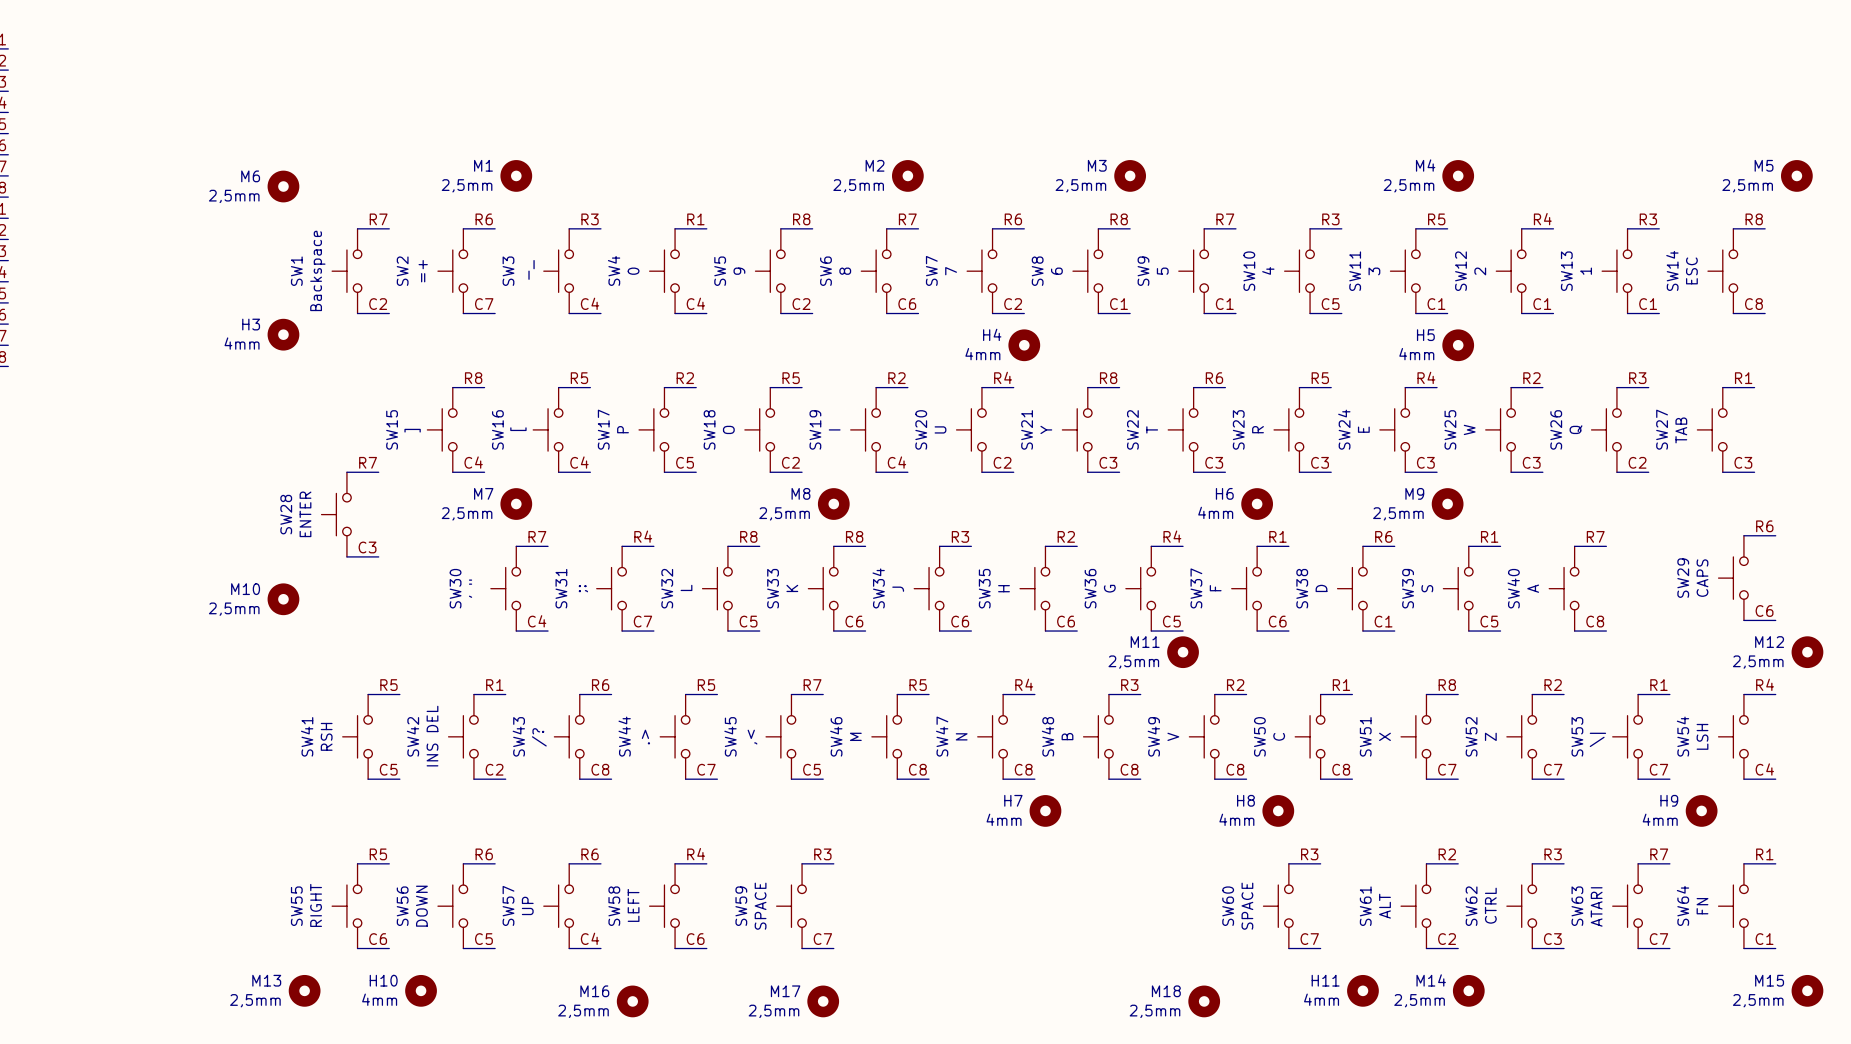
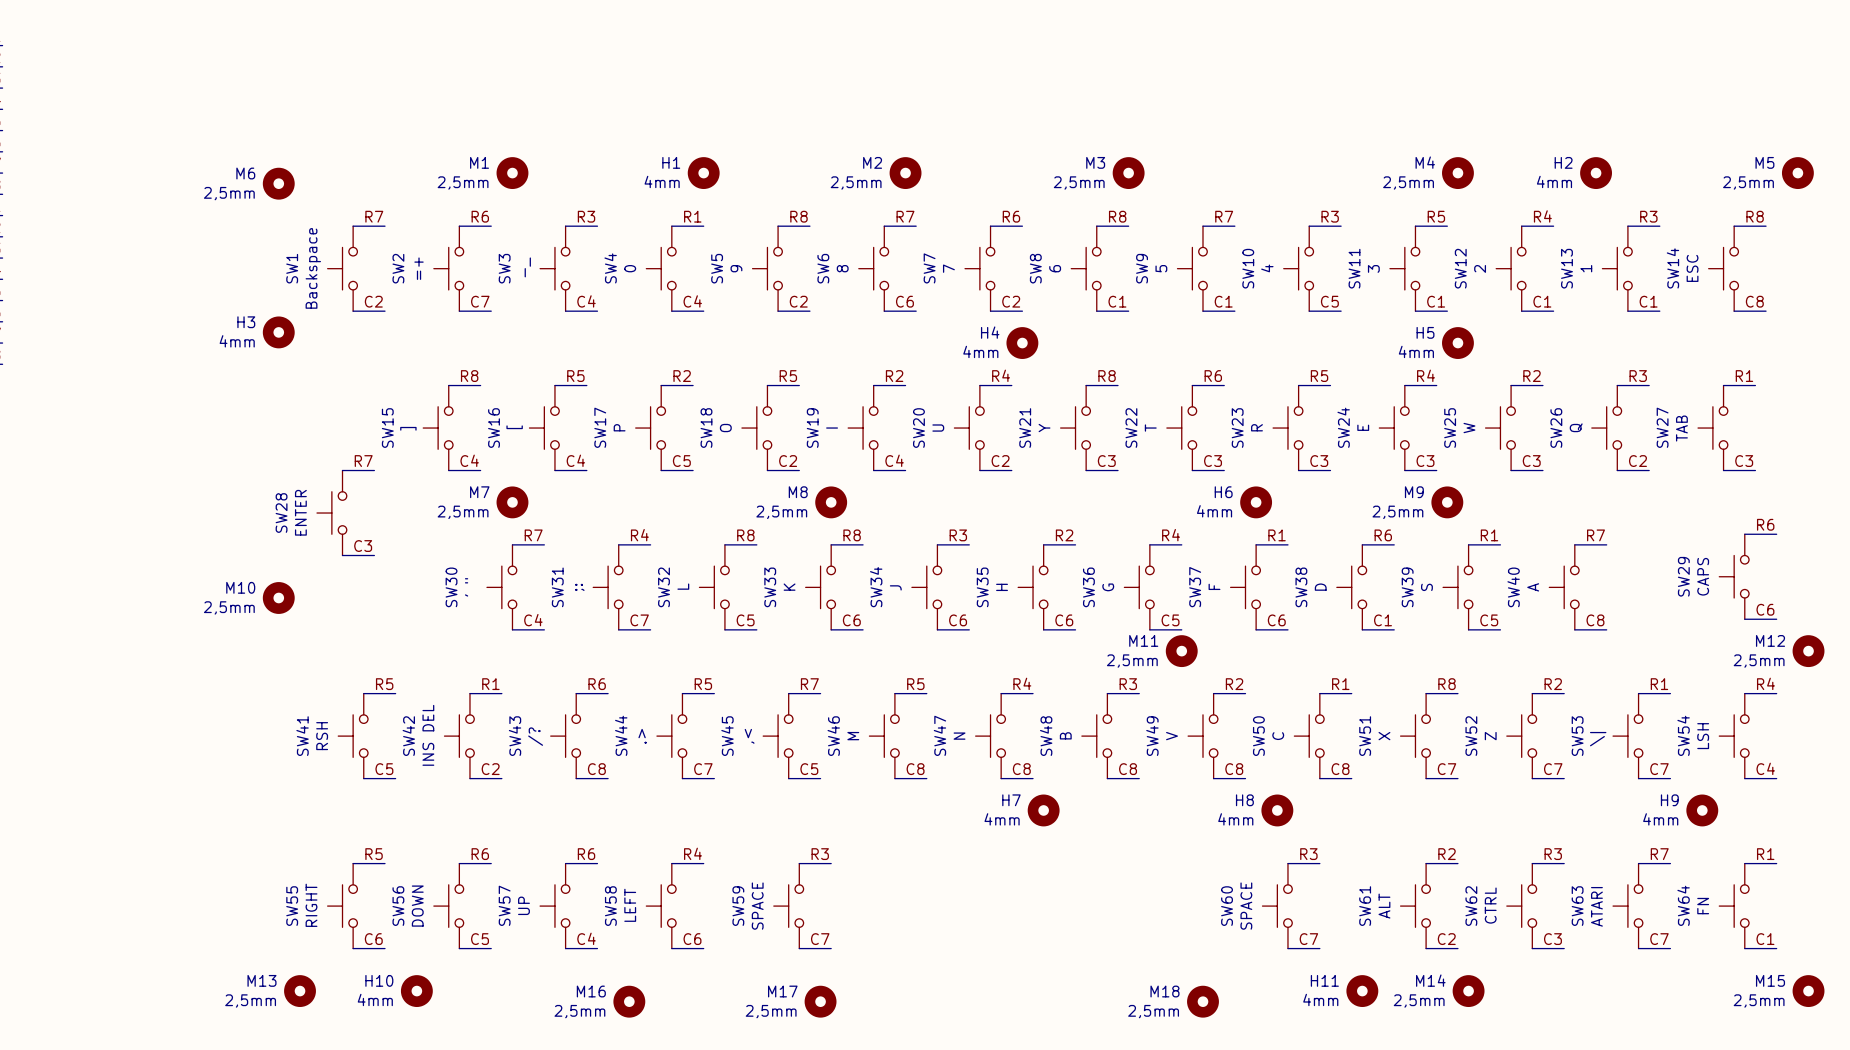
H1: none -> 4mm (703, 173)
H2: none -> 4mm (1596, 173)

